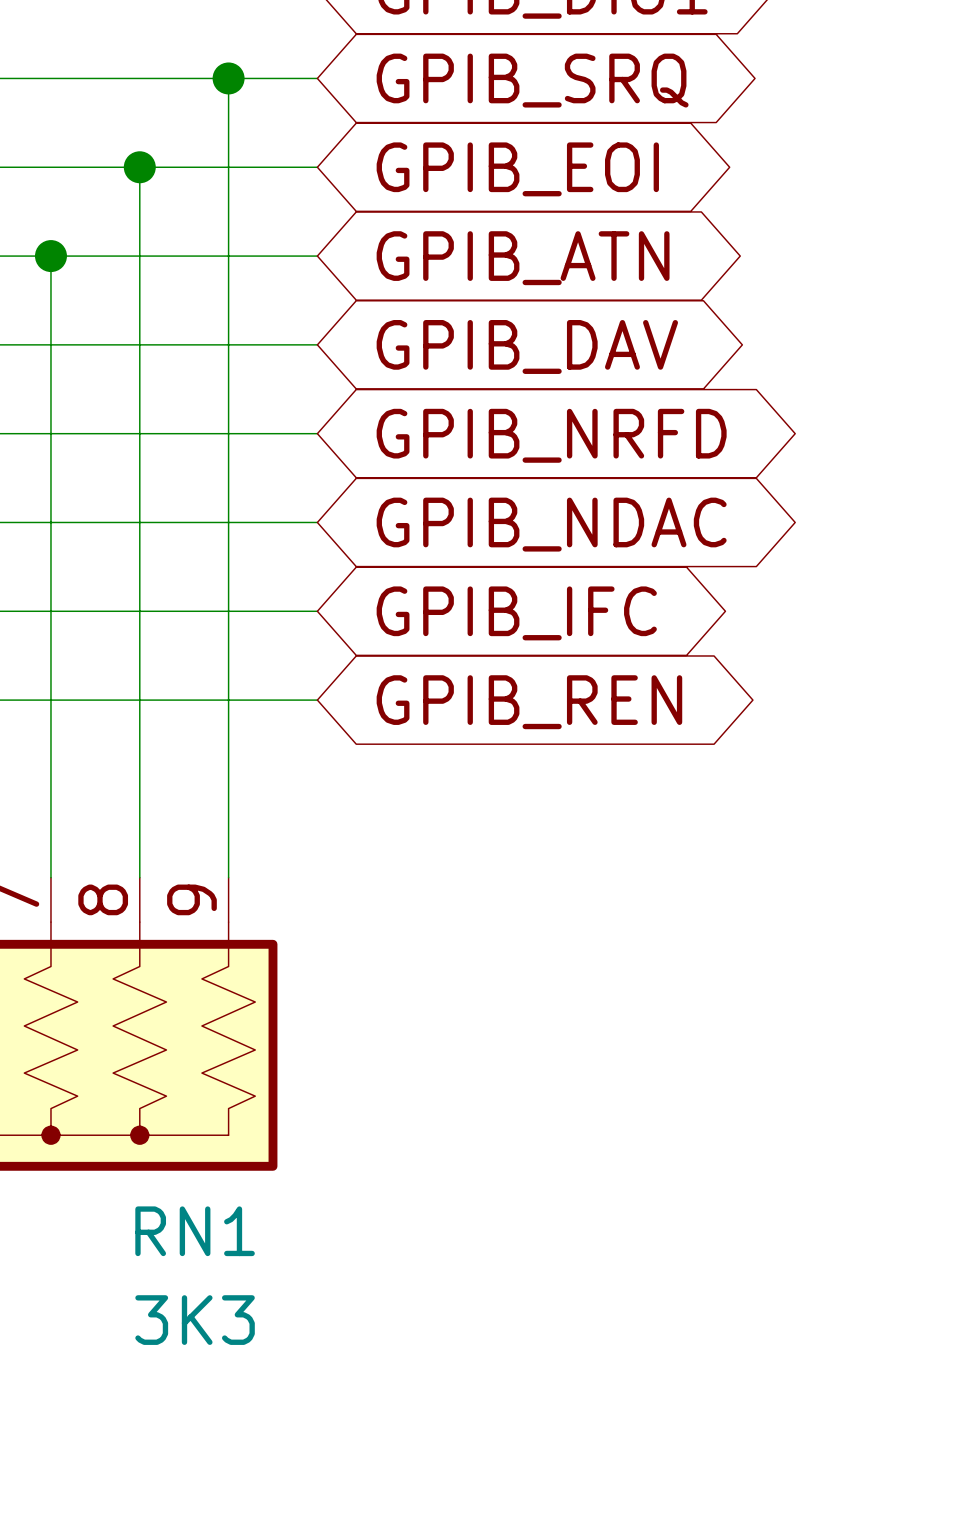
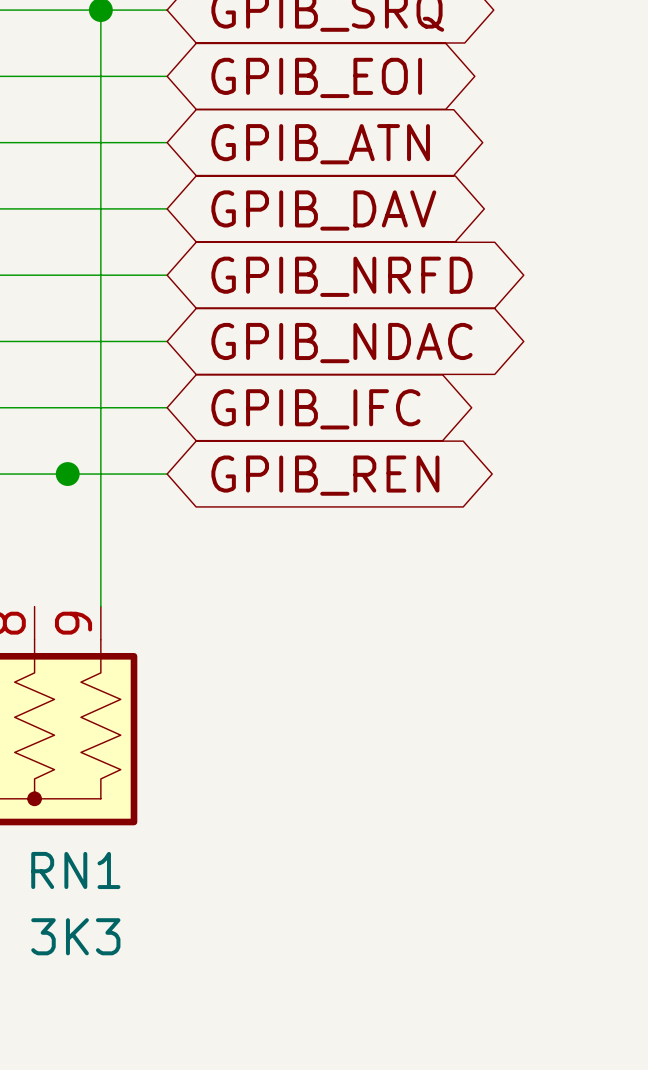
wire: (139, 167) (139, 877) -> none
junction: (139, 167) -> none
junction: none -> (67, 474)

